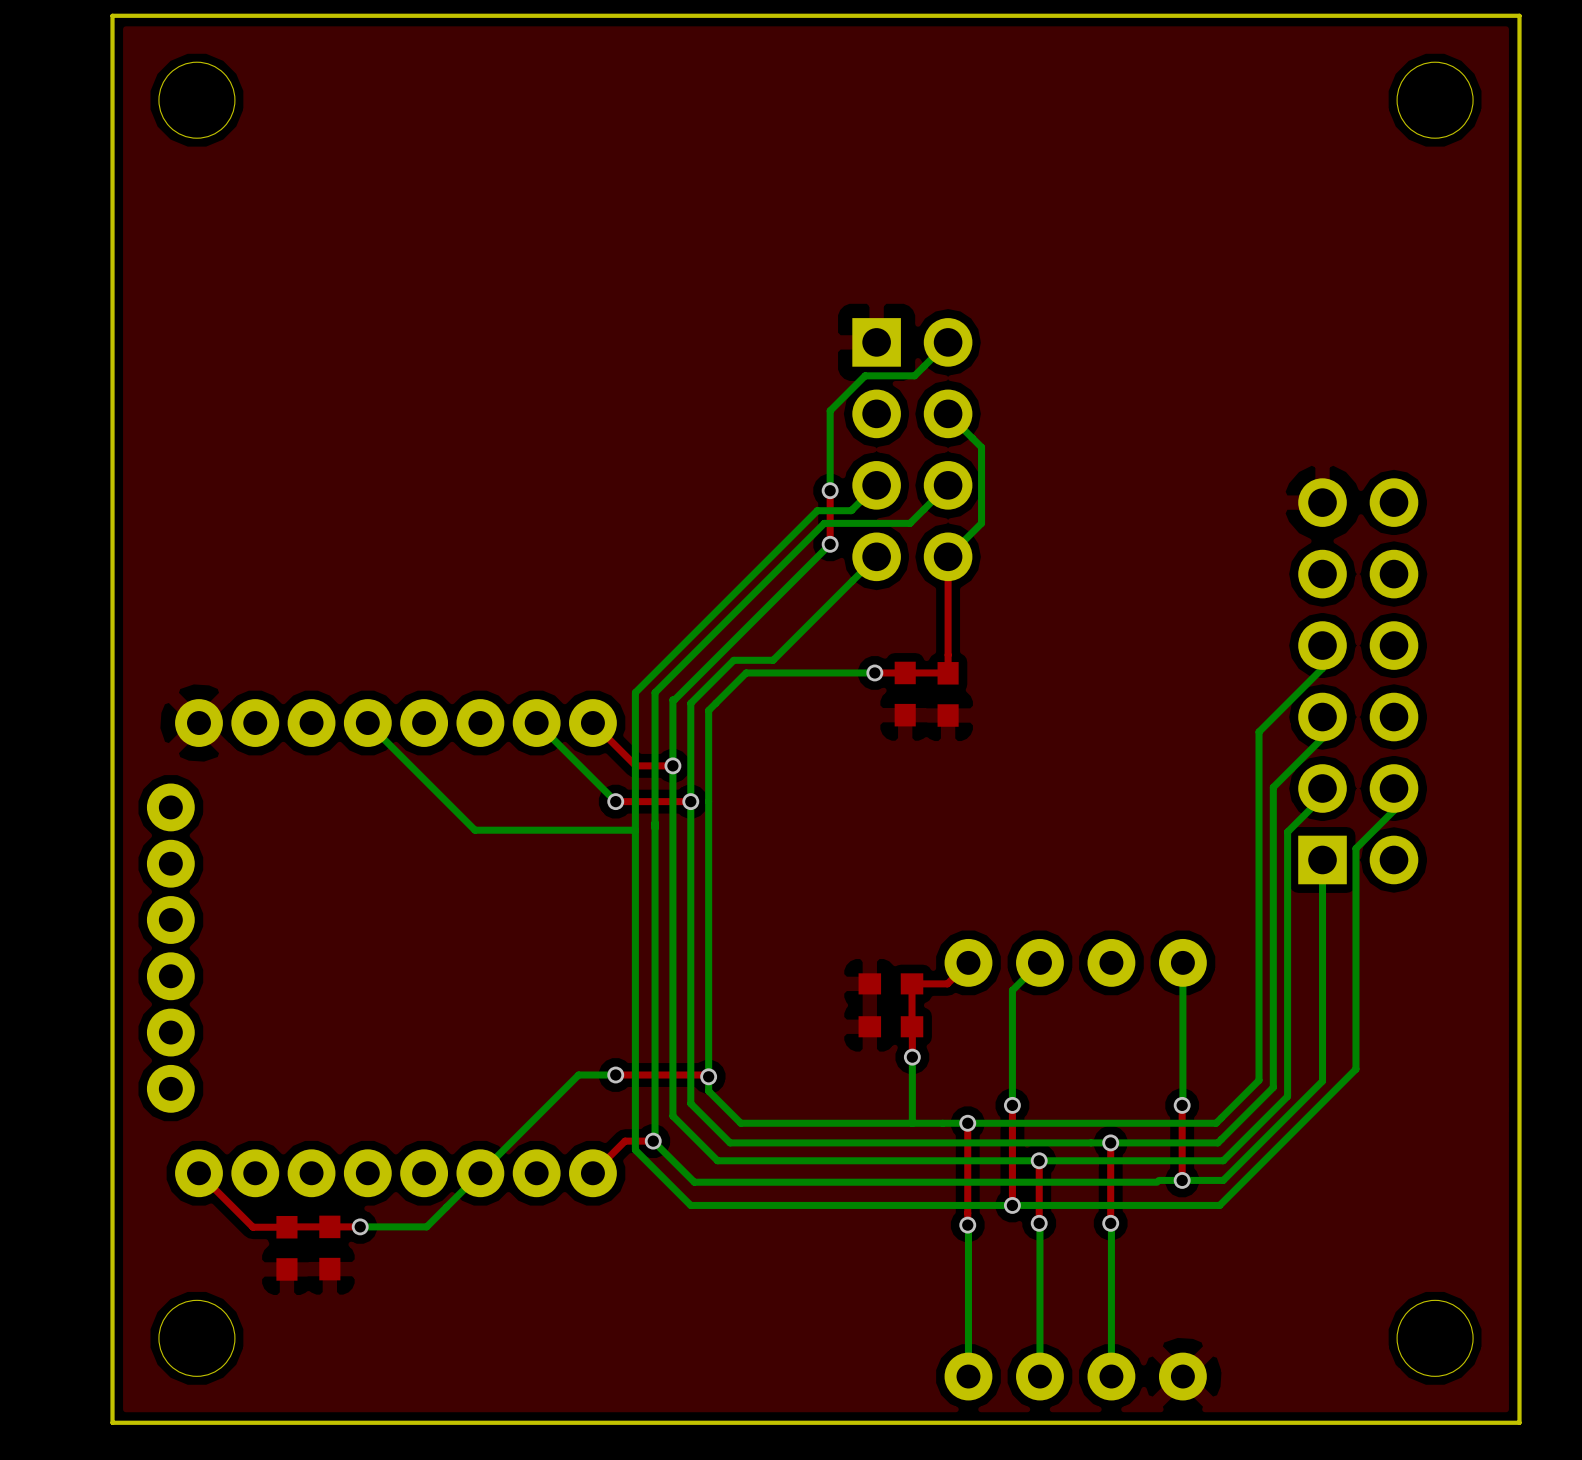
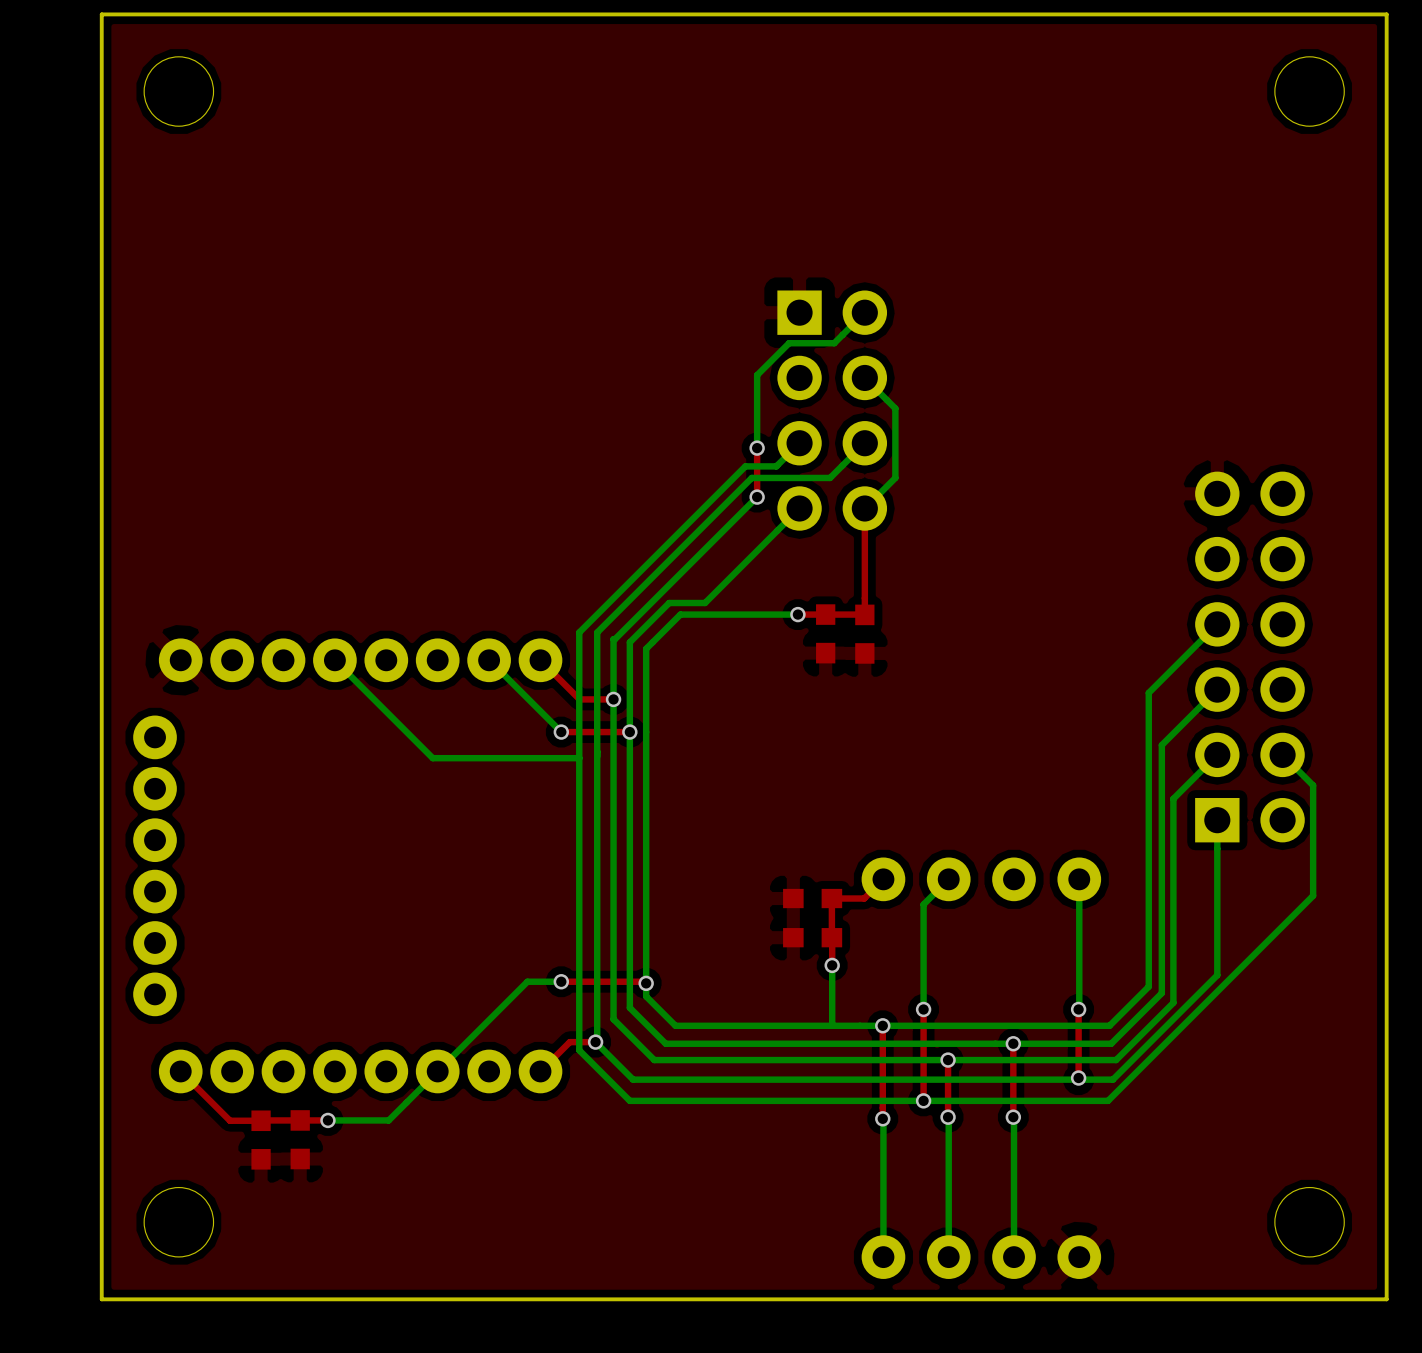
bottom track: (1322, 645) (1322, 668) (1259, 731) (1259, 758) -> (1217, 624) (1148, 692)
part position: (1358, 681) -> (1249, 657)
bottom track: (1322, 717) (1322, 738) (1273, 787) (1273, 815) -> (1217, 689) (1161, 745)
bottom track: (1322, 788) (1322, 797) (1287, 831) (1287, 1096) (1285, 1098) -> (1217, 754) (1173, 798) (1173, 1002)
bottom track: (1394, 788) (1394, 810) (1355, 848) (1355, 1069) (1219, 1205) (1214, 1205) -> (1282, 754) (1313, 785) (1313, 895) (1108, 1100)
bottom track: (1322, 859) (1322, 1081) (1223, 1180) (1158, 1180) -> none
bottom track: none -> (1217, 820) (1217, 975) (1112, 1079) (1055, 1079)

